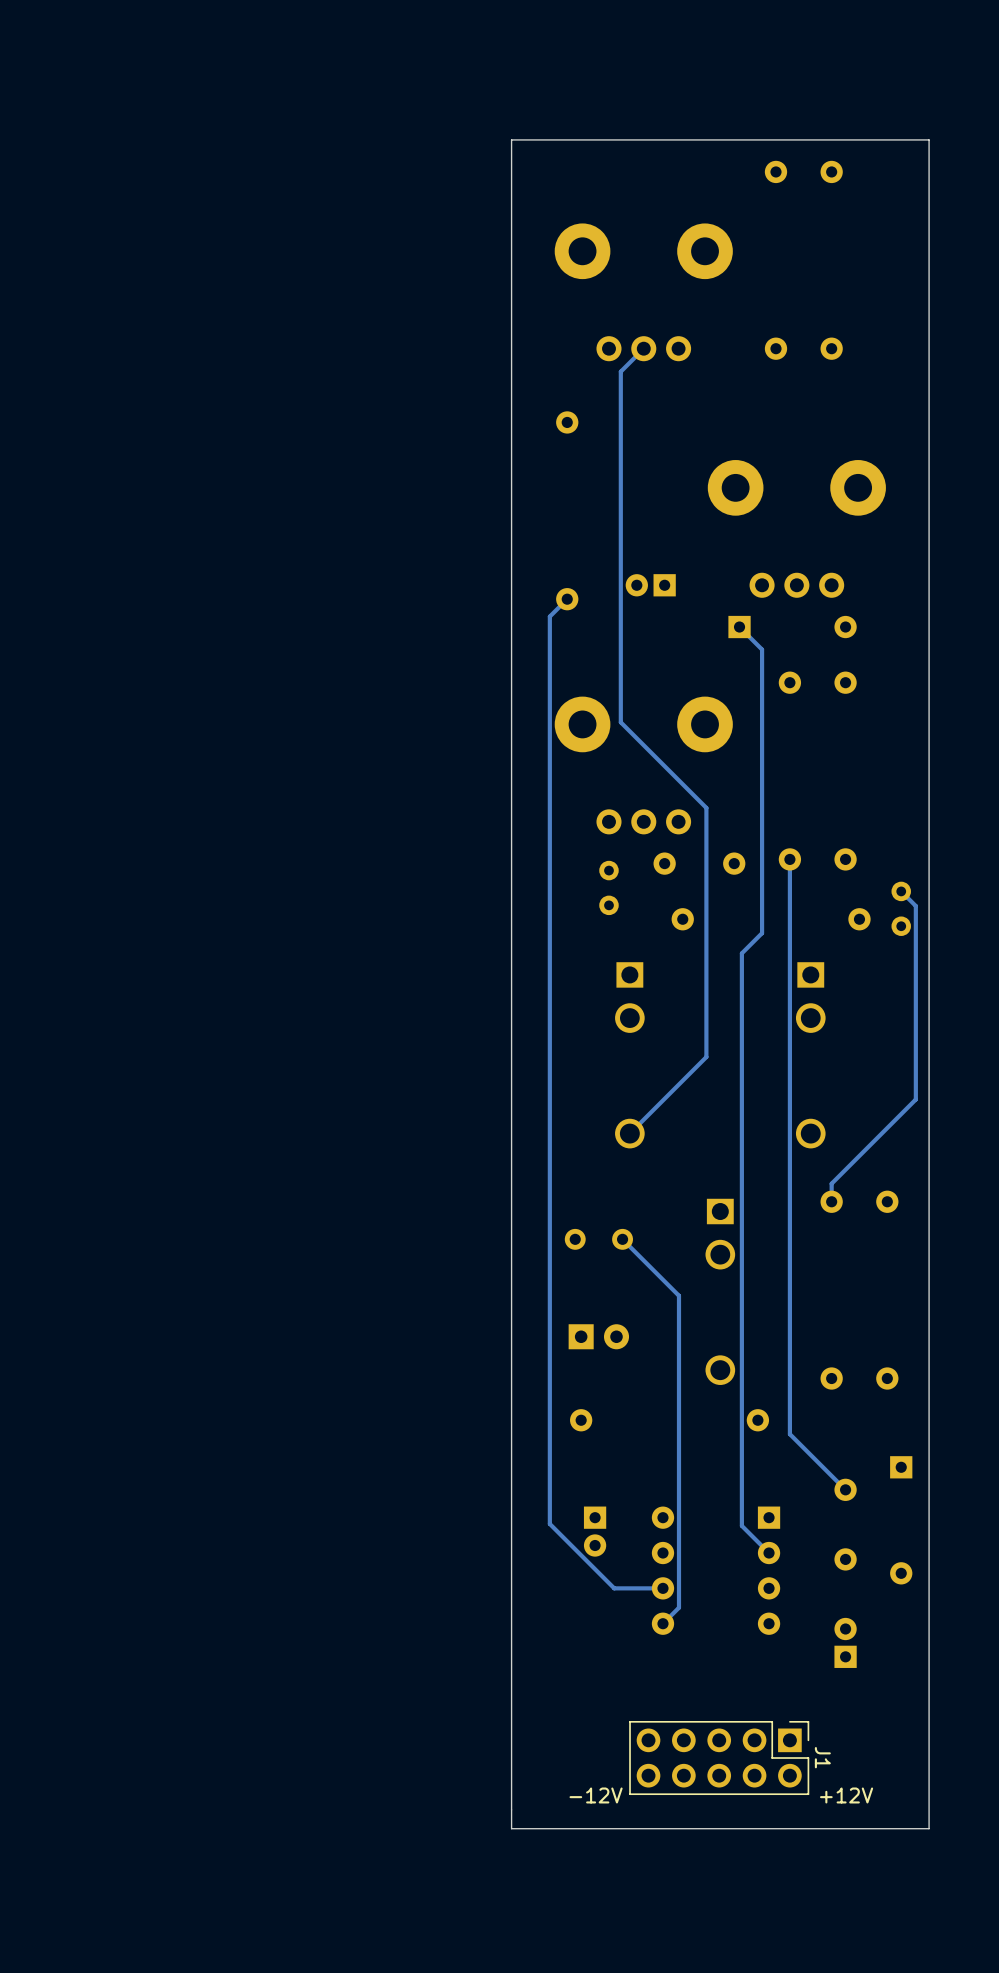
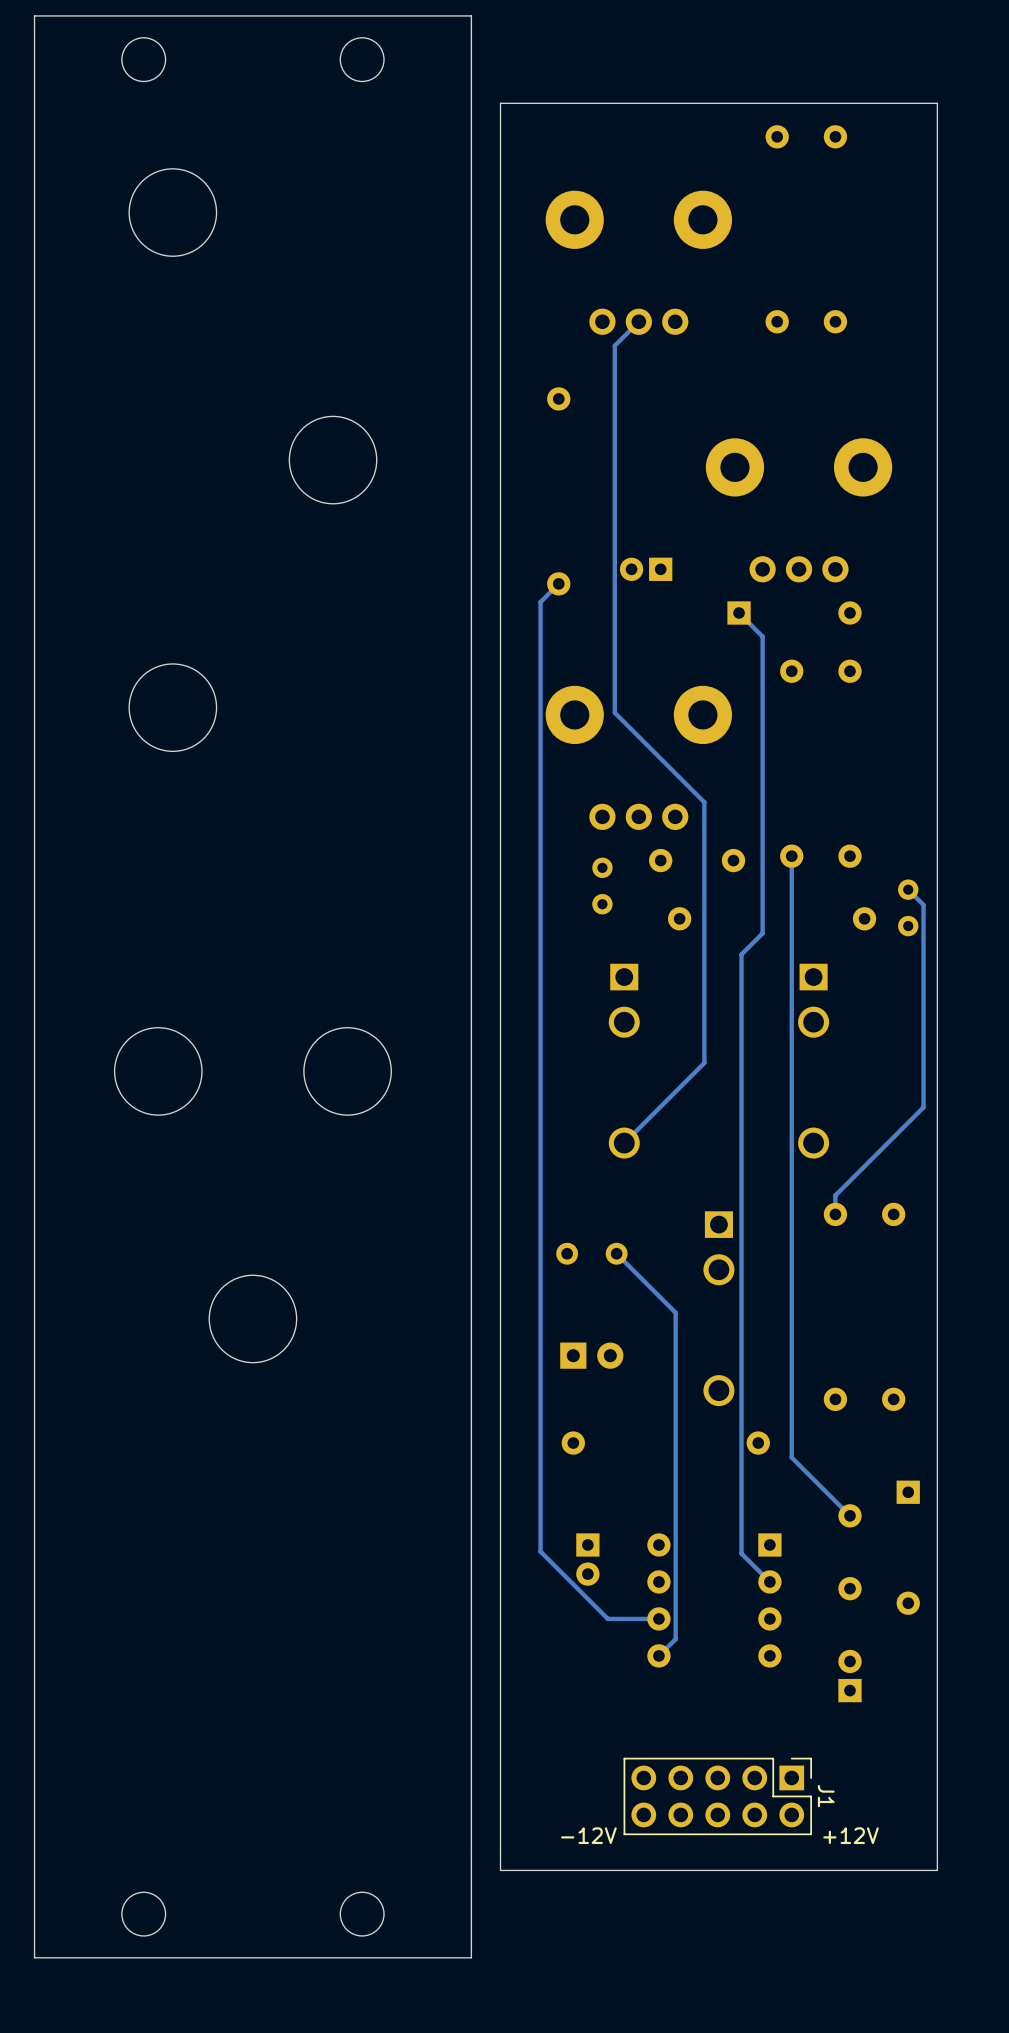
board edge: none -> (471, 15) (471, 1957) (34, 1957) (34, 15) (471, 15)
round board edge: none -> [121, 37, 166, 82]
round board edge: none -> [339, 37, 385, 82]
round board edge: none -> [128, 168, 217, 257]
round board edge: none -> [288, 416, 378, 505]
round board edge: none -> [128, 663, 217, 752]
round board edge: none -> [114, 1027, 203, 1116]
round board edge: none -> [303, 1027, 392, 1116]
round board edge: none -> [208, 1274, 298, 1364]
round board edge: none -> [121, 1891, 166, 1937]
round board edge: none -> [339, 1891, 385, 1937]

